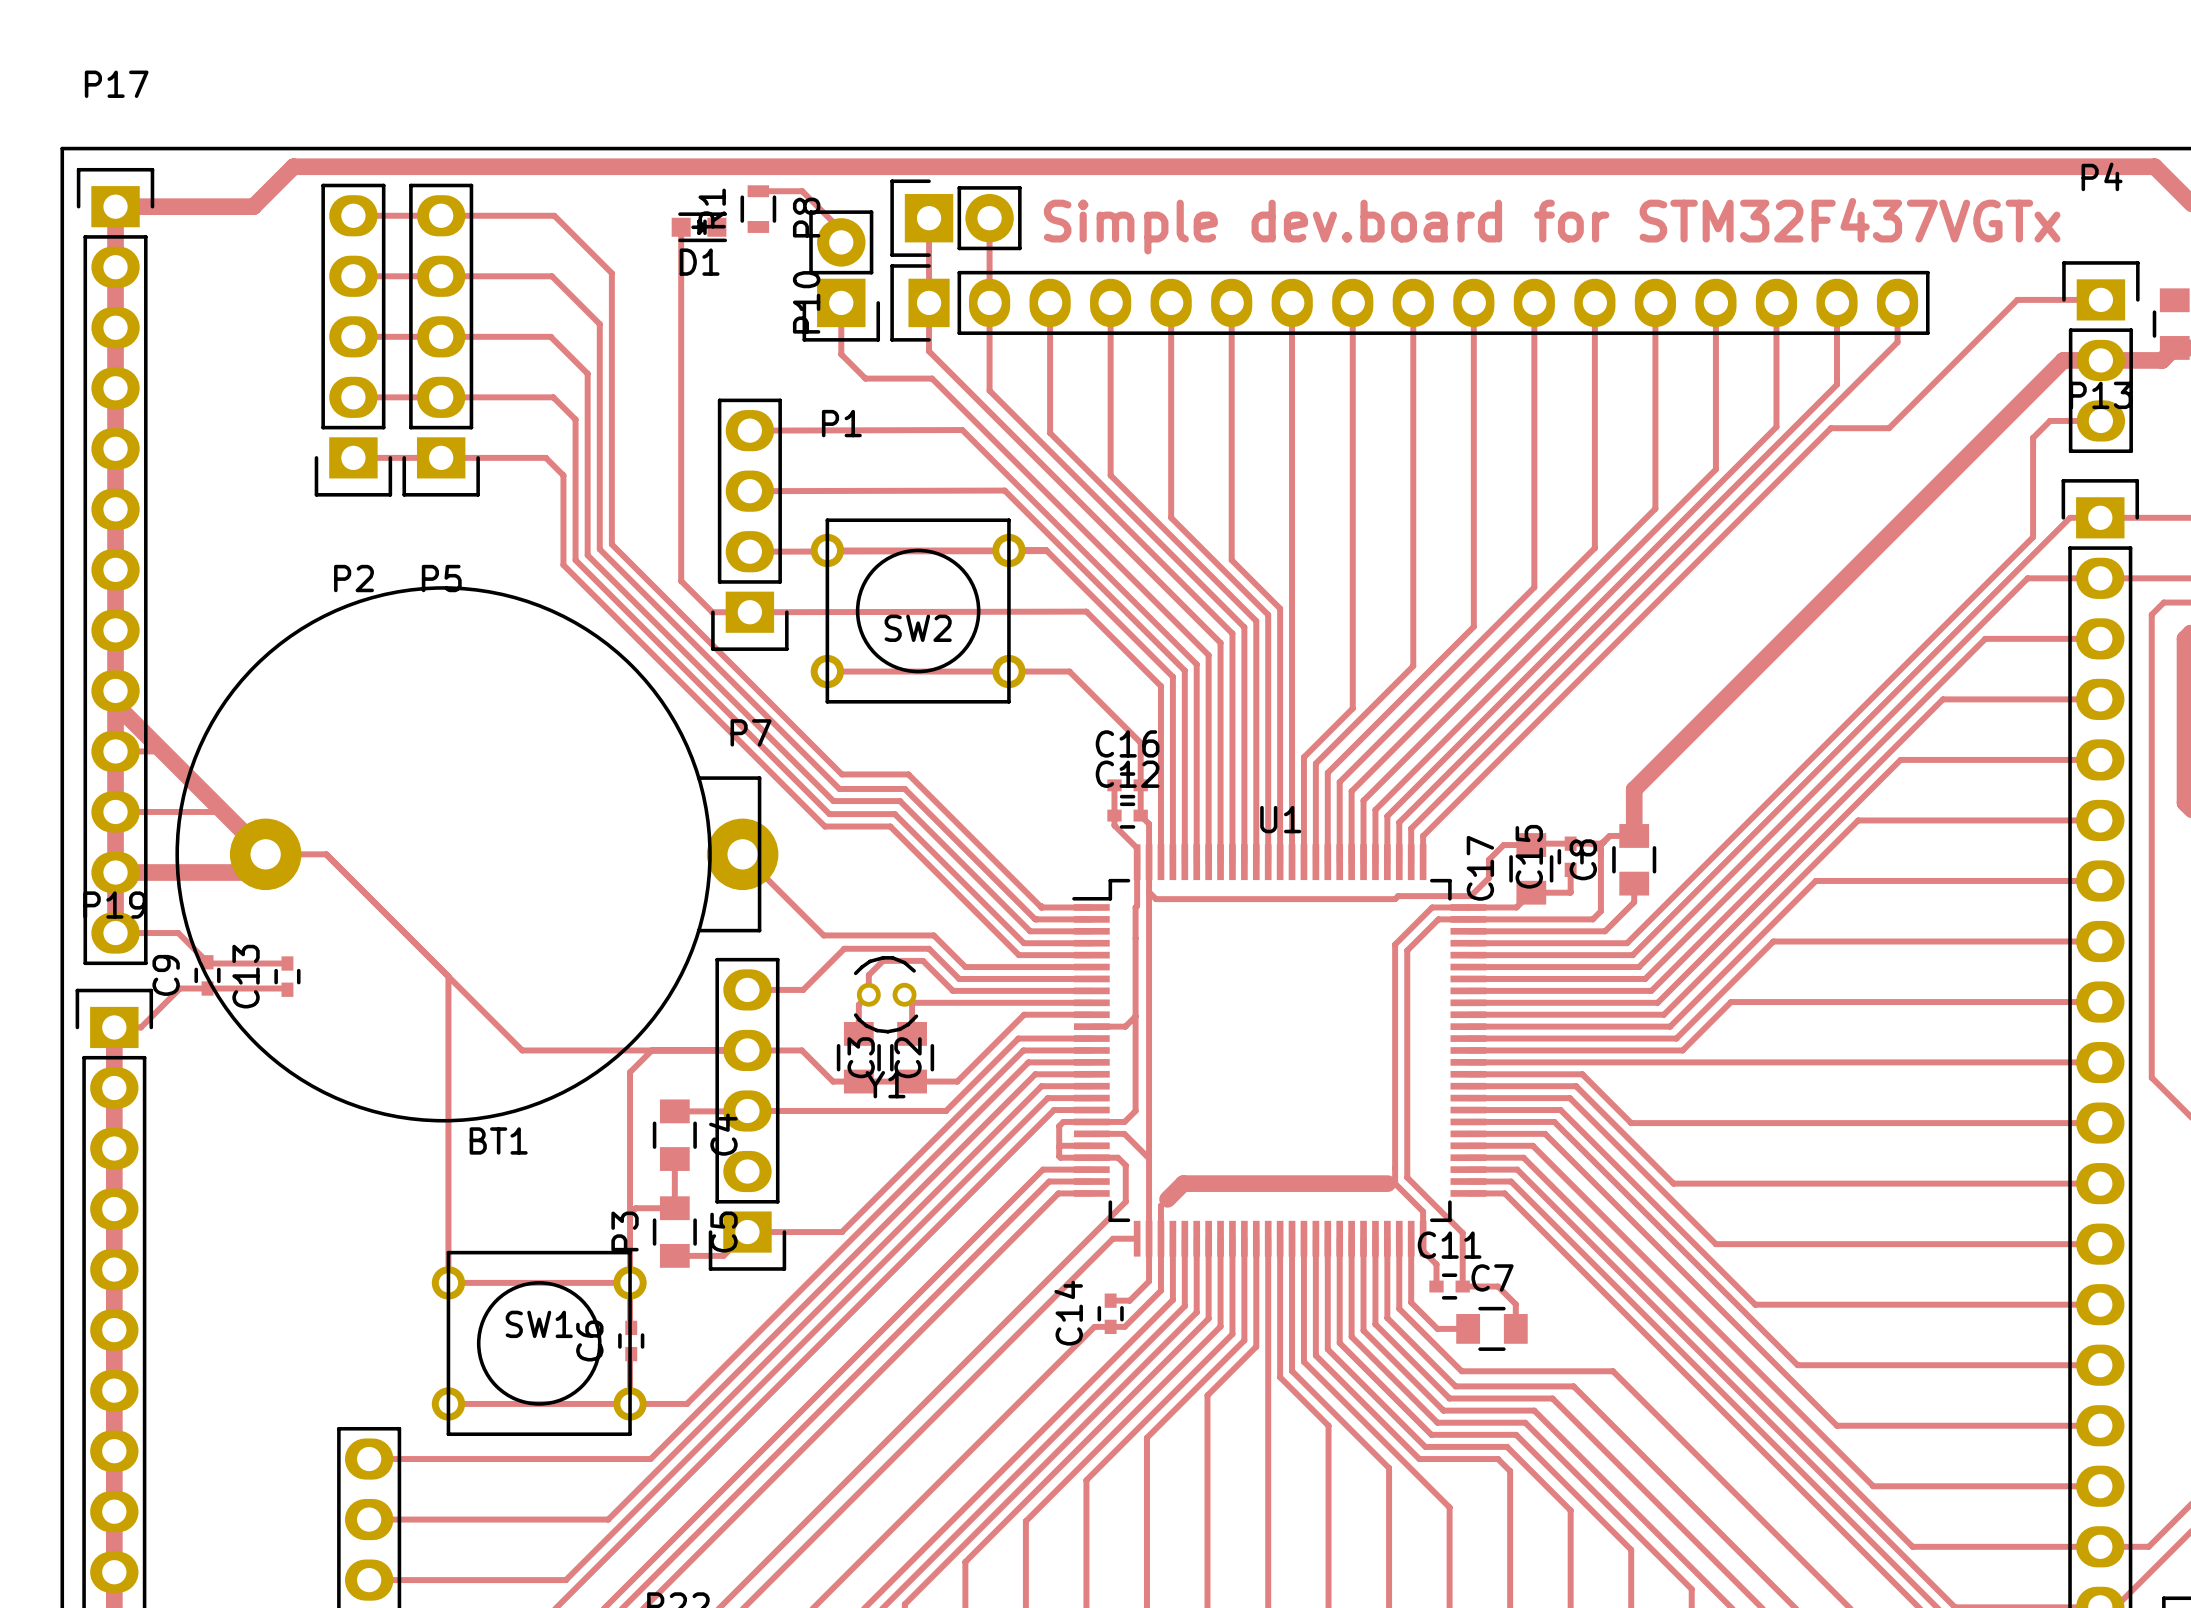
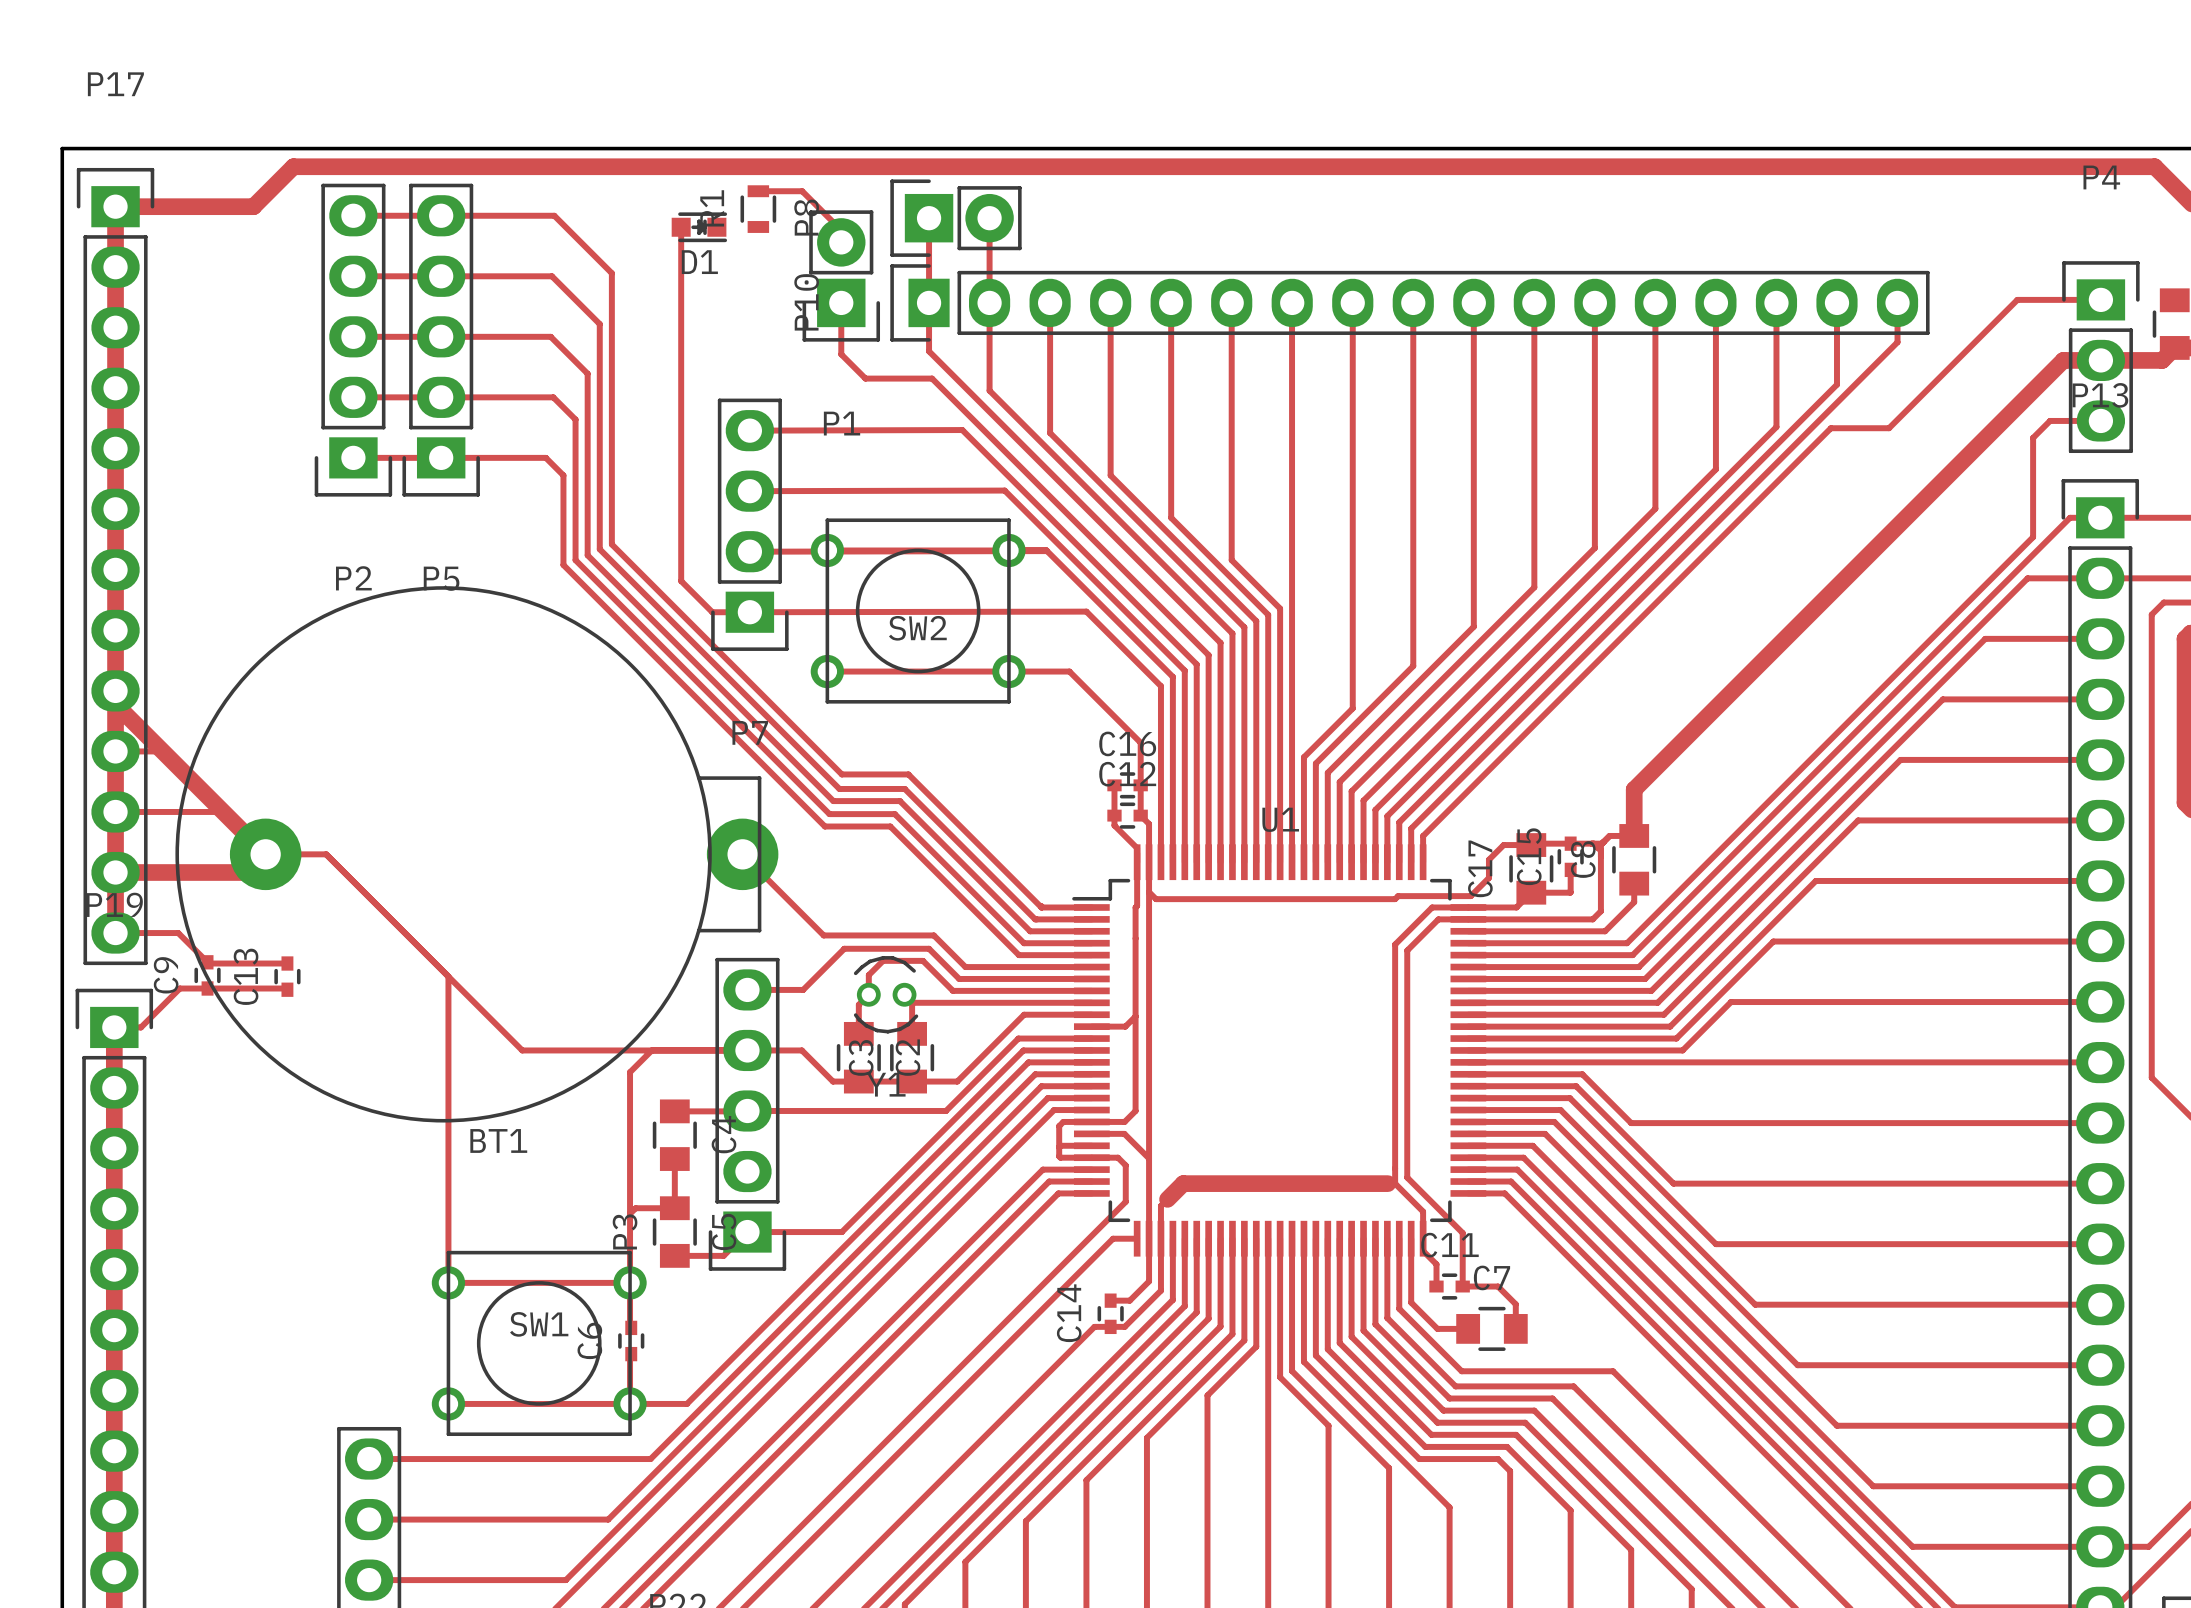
text: Simple dev.board for STM32F437VGTx (1552, 226) -> none

